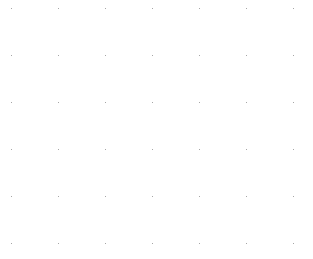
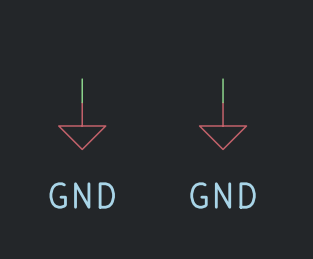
wire: none -> (82, 79) (82, 102)
wire: none -> (223, 79) (223, 102)
power symbol: none -> GND (82, 125)
power symbol: none -> GND (223, 125)

